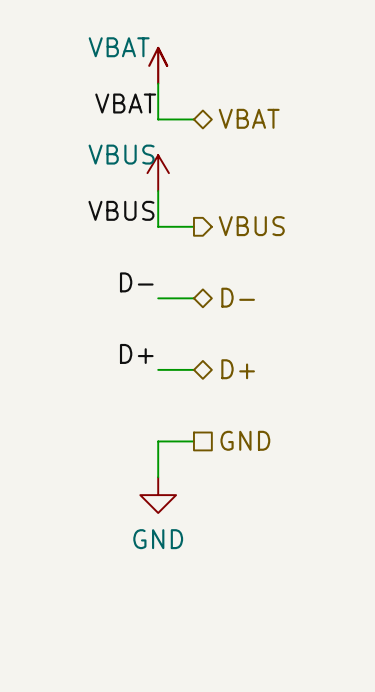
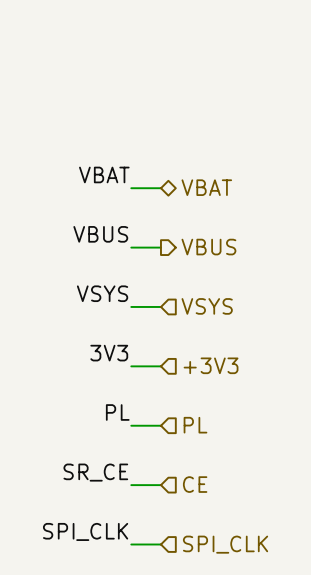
power symbol: VBAT (158, 65) -> none
wire: (158, 83) (158, 119) (193, 119) -> none
label: VBAT (125, 103) -> none
hierarchical label: VBAT (249, 118) -> none
power symbol: VBUS (158, 173) -> none
wire: (158, 191) (158, 226) -> none
label: VBUS (121, 210) -> VBAT (104, 174)
hierarchical label shape: output (251, 226) -> bidirectional (206, 187)
hierarchical label: VBUS (251, 226) -> VBAT (206, 187)
label: D- (136, 282) -> VBUS (100, 234)
hierarchical label shape: bidirectional (238, 297) -> output (208, 247)
hierarchical label: D- (238, 297) -> VBUS (208, 247)
label: D+ (136, 353) -> VSYS (102, 293)
hierarchical label shape: bidirectional (238, 369) -> input (207, 306)
hierarchical label: D+ (238, 369) -> VSYS (207, 306)
label: none -> 3V3 (109, 353)
hierarchical label shape: passive (245, 440) -> input (211, 365)
hierarchical label: GND (245, 440) -> +3V3 (211, 365)
wire: (158, 441) (158, 477) -> none
power symbol: GND (158, 495) -> none
label: none -> PL (117, 412)
hierarchical label: none -> PL (195, 425)
wire: none -> (131, 425) (160, 425)
label: none -> SR_CE (95, 472)
hierarchical label: none -> CE (195, 484)
wire: none -> (131, 485) (160, 485)
label: none -> SPI_CLK (85, 531)
wire: none -> (131, 544) (160, 544)
hierarchical label: none -> SPI_CLK (225, 544)

